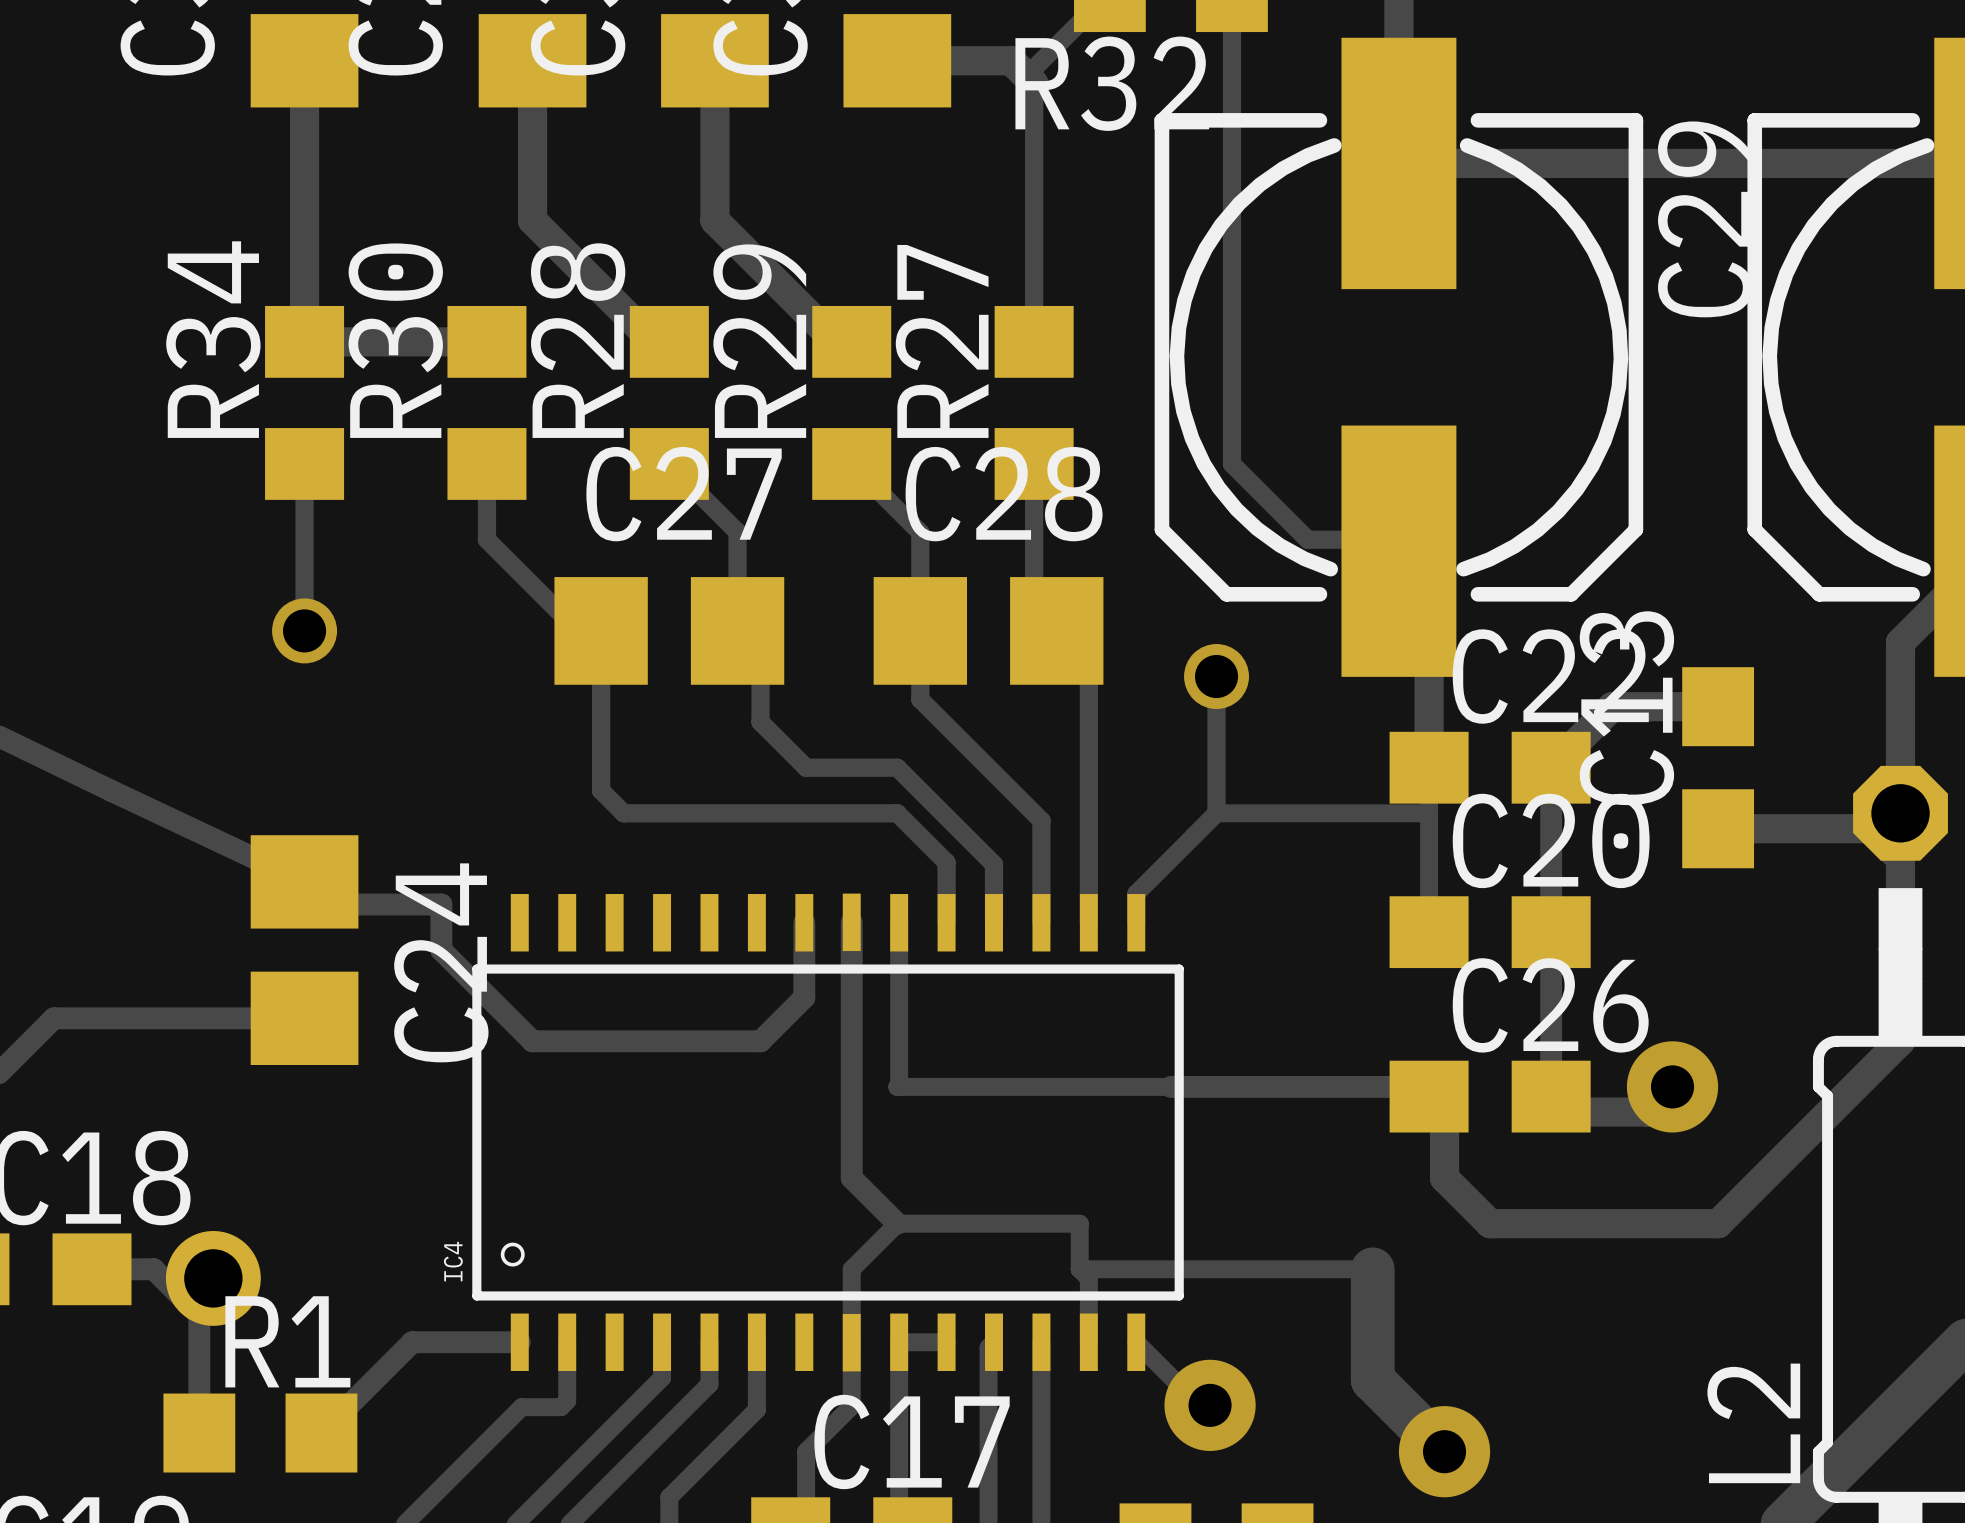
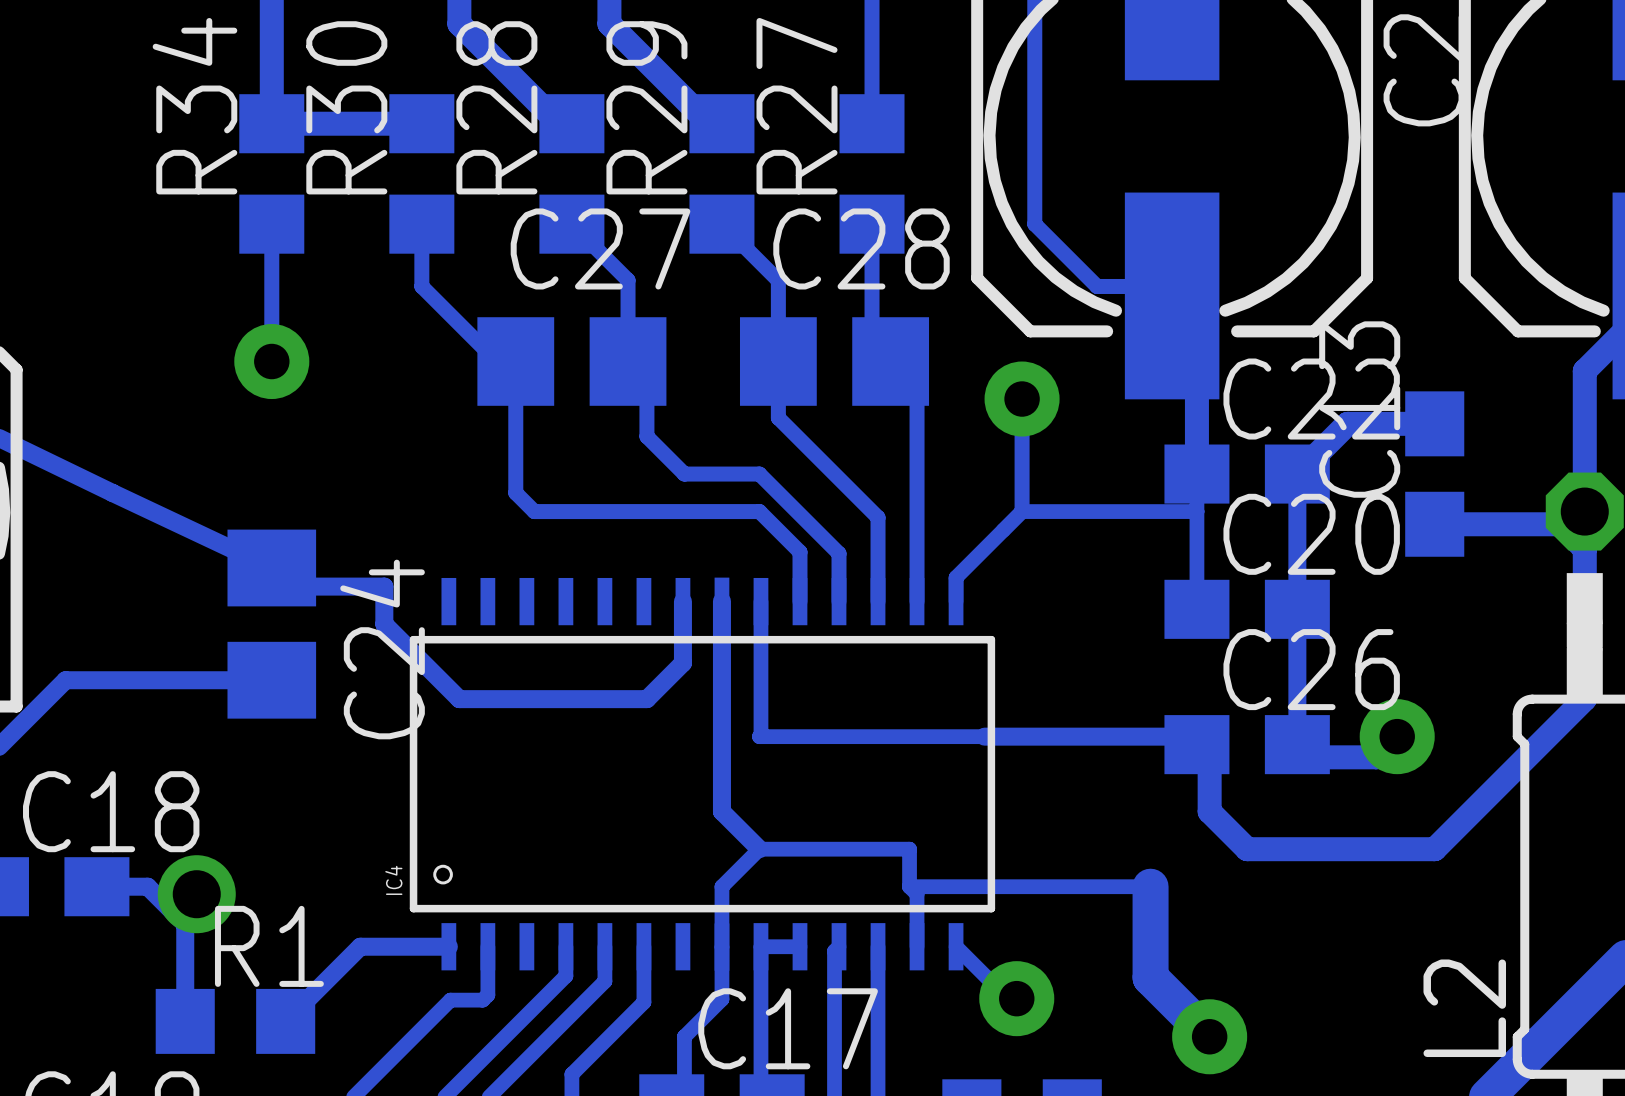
via size: [272, 598, 338, 664] -> [234, 323, 310, 400]
via size: [1184, 644, 1250, 710] -> [984, 361, 1060, 437]

